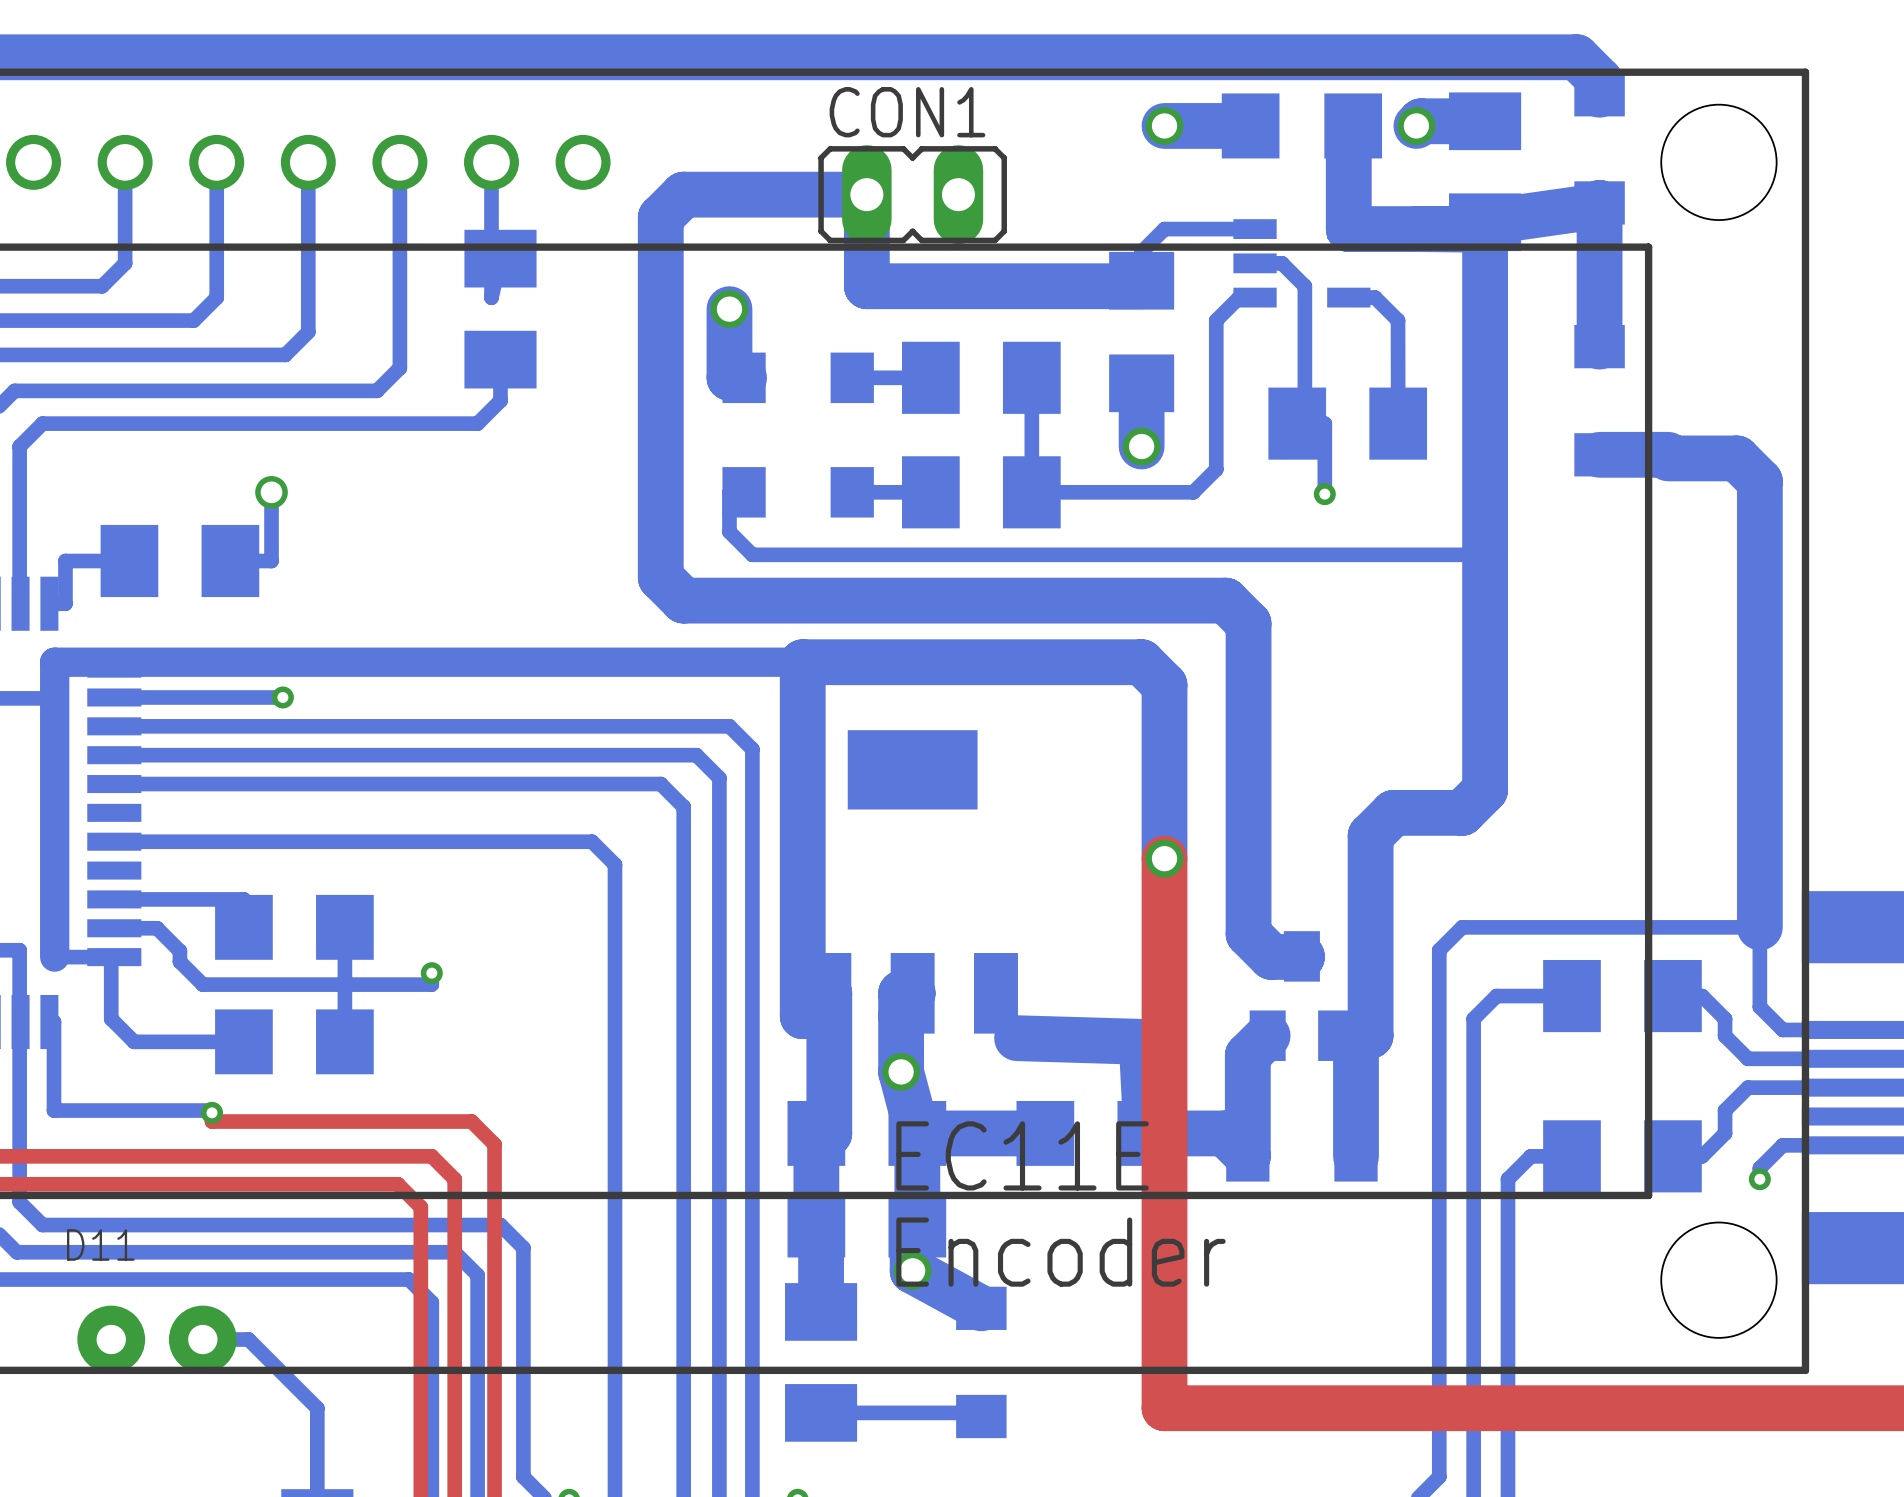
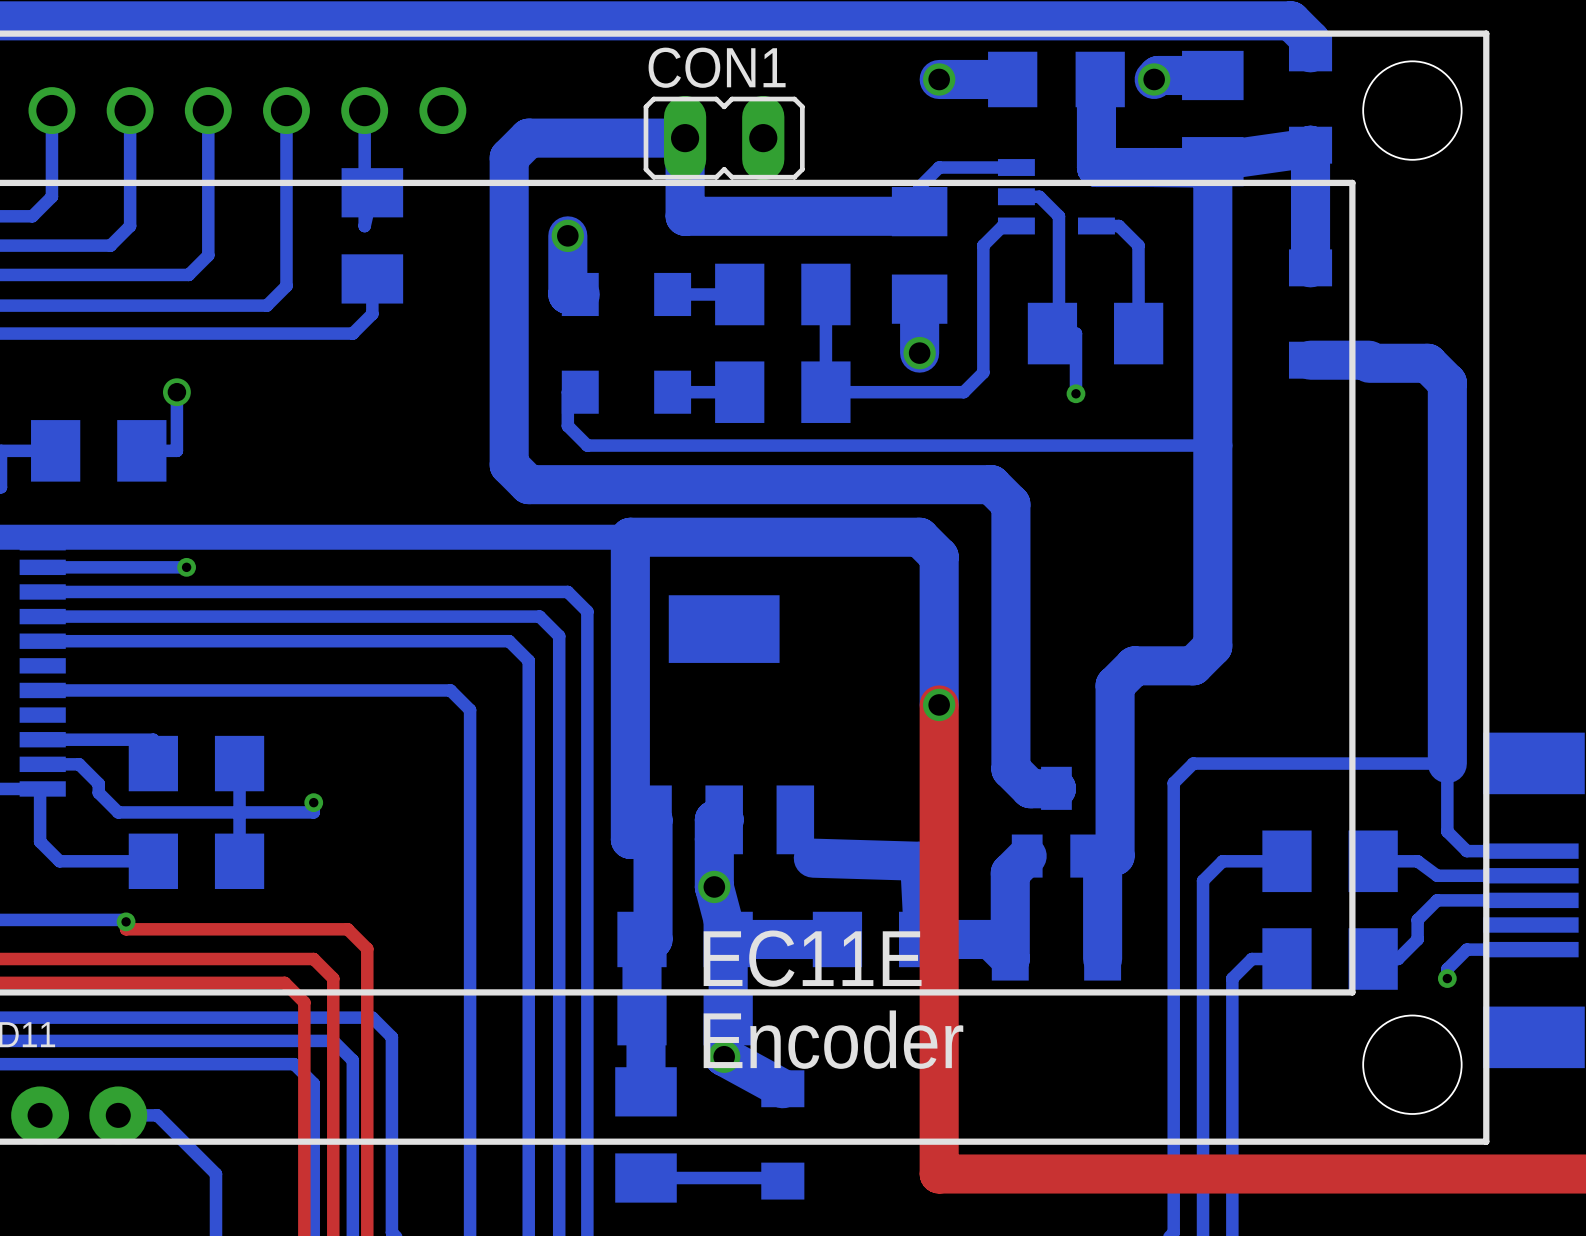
bottom track: (1571, 996) (1496, 996) (1473, 1018) (1473, 1064) -> (1286, 861) (1222, 861) (1203, 880)
part position: (1622, 996) -> (1330, 861)
bottom track: (1672, 996) (1702, 996) (1725, 1018) (1725, 1035) (1747, 1058) -> (1373, 861) (1417, 861) (1437, 875)

